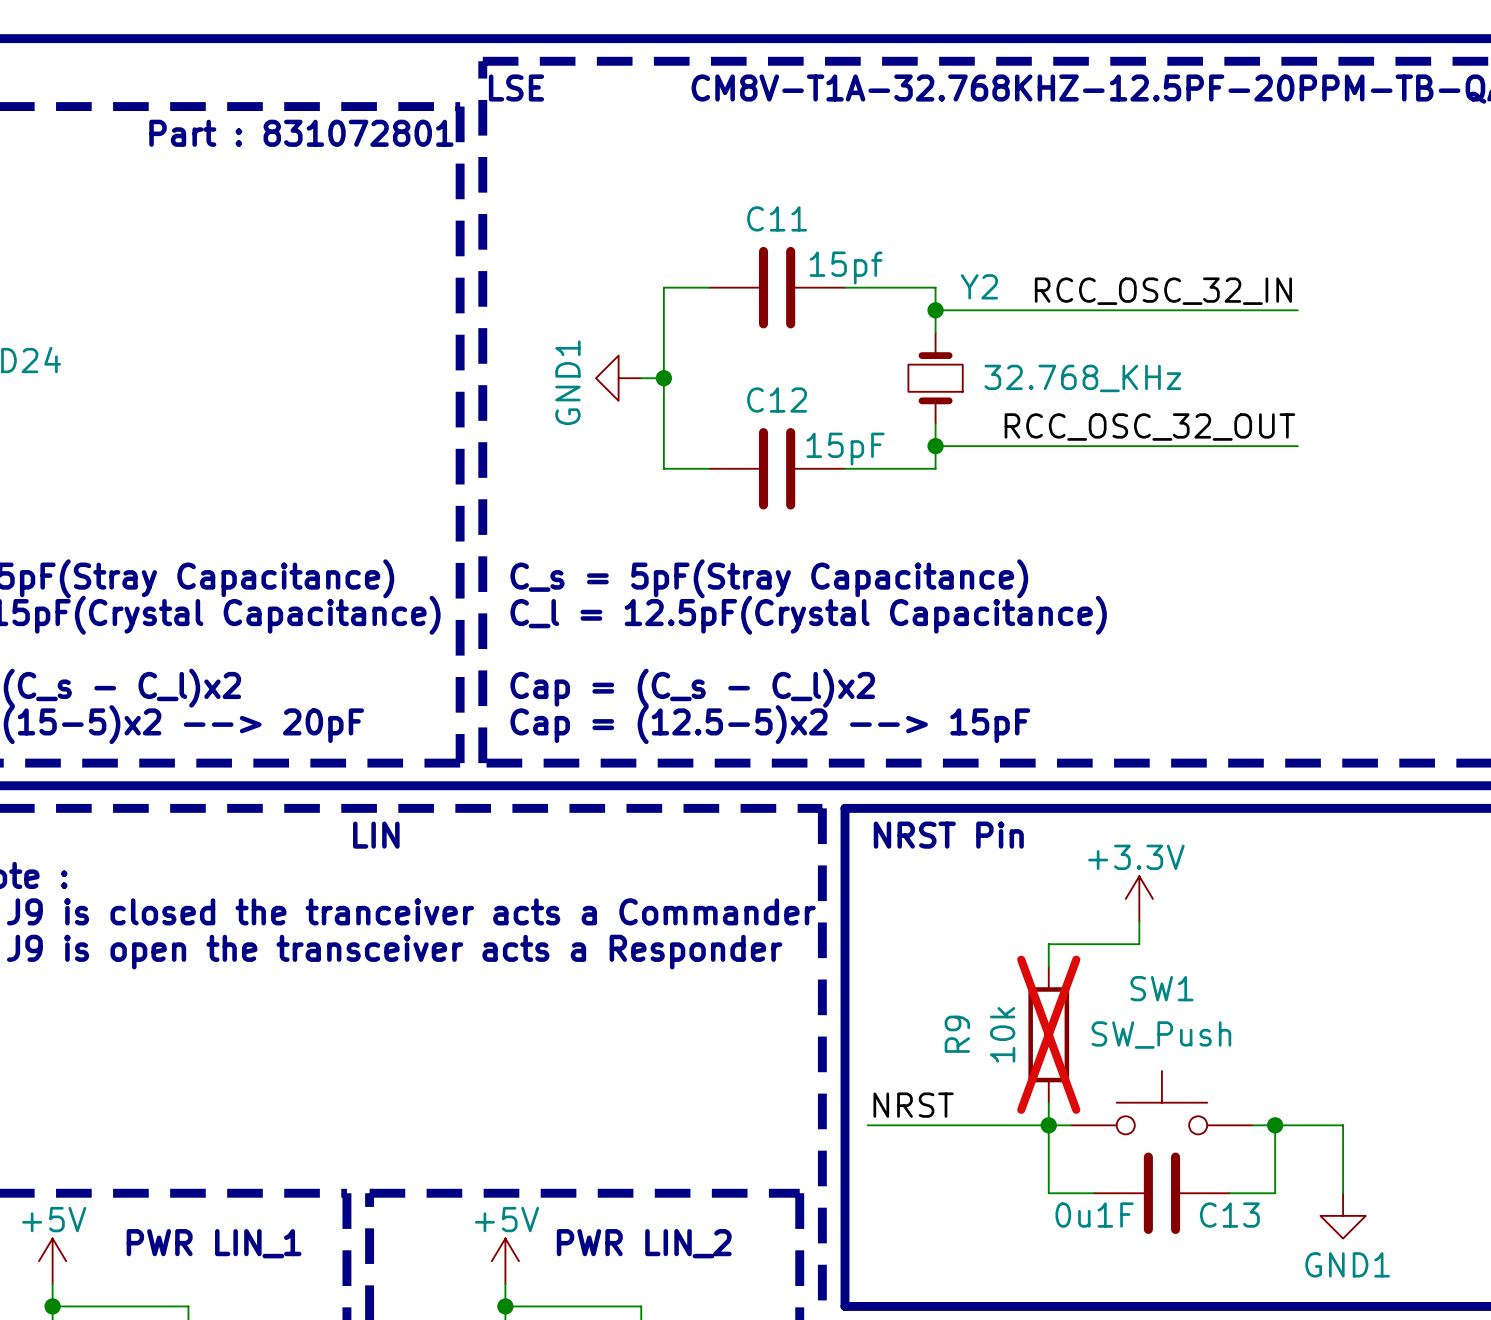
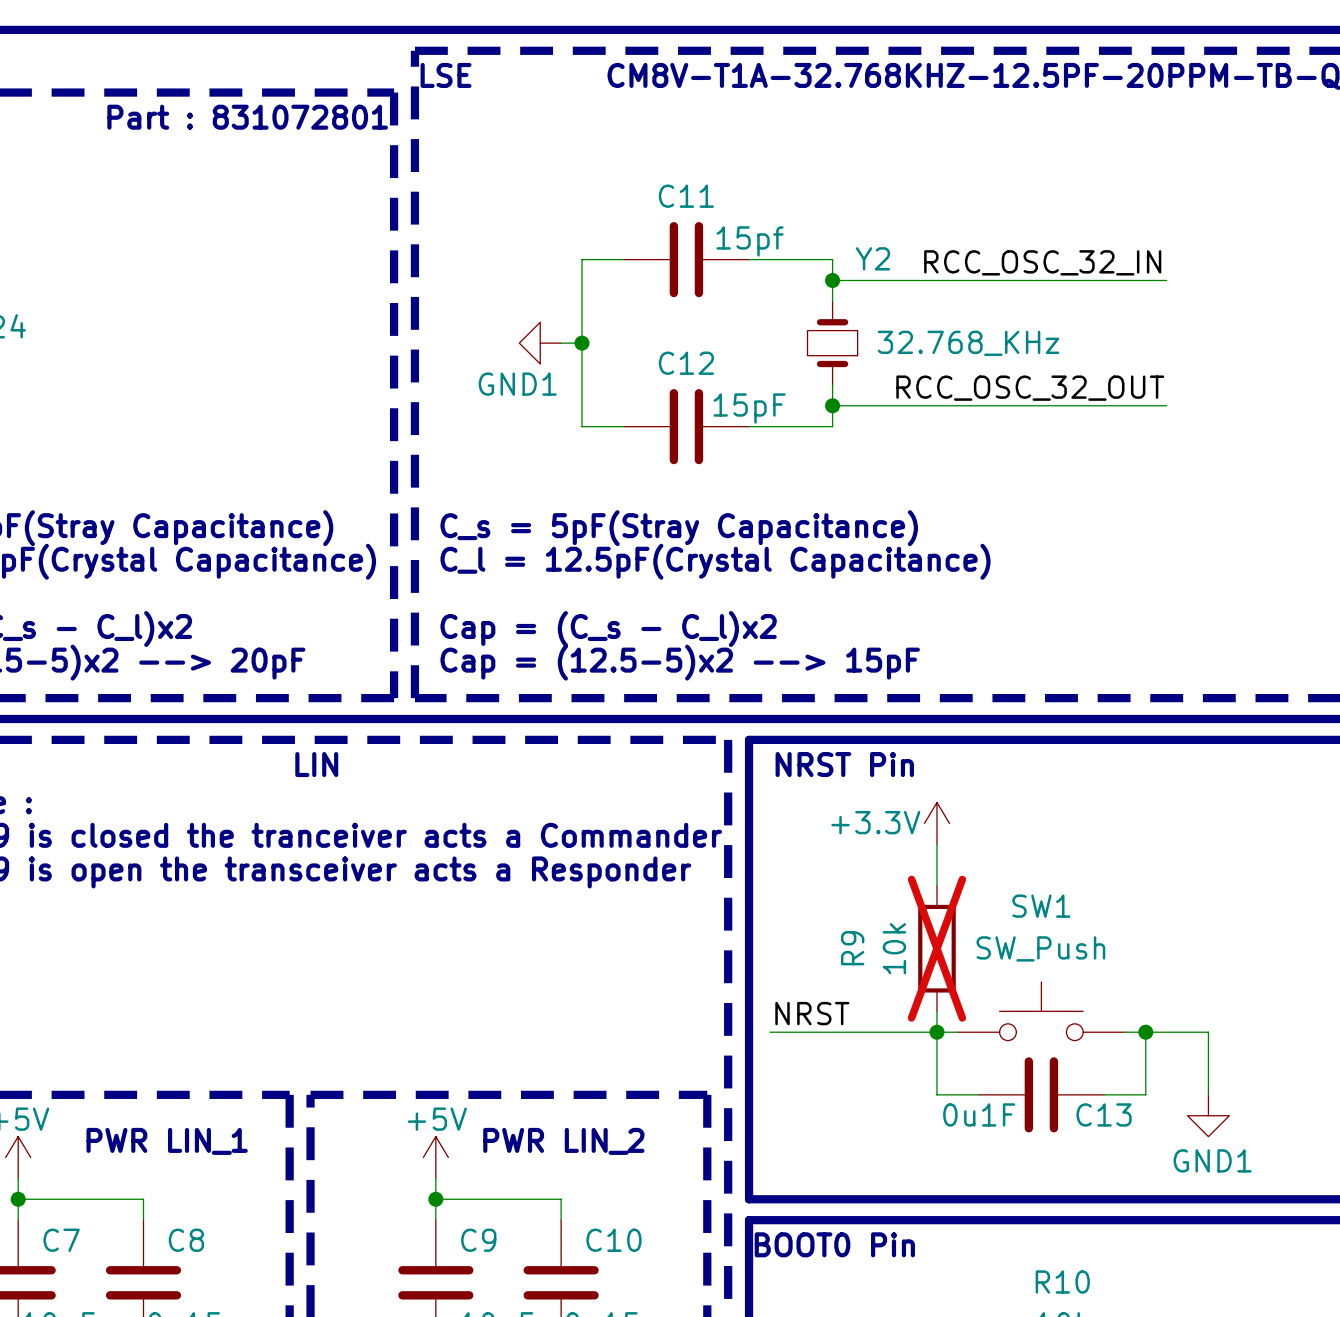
power symbol text rotation: 0° (567, 382) -> 90° clockwise (517, 384)
power symbol text position: +3.3V (1136, 857) -> +3.3V (875, 822)
power symbol position: +3.3V (1139, 898) -> +3.3V (936, 823)
wire: (1139, 921) (1139, 944) (1048, 944) -> (936, 844) (936, 865)

